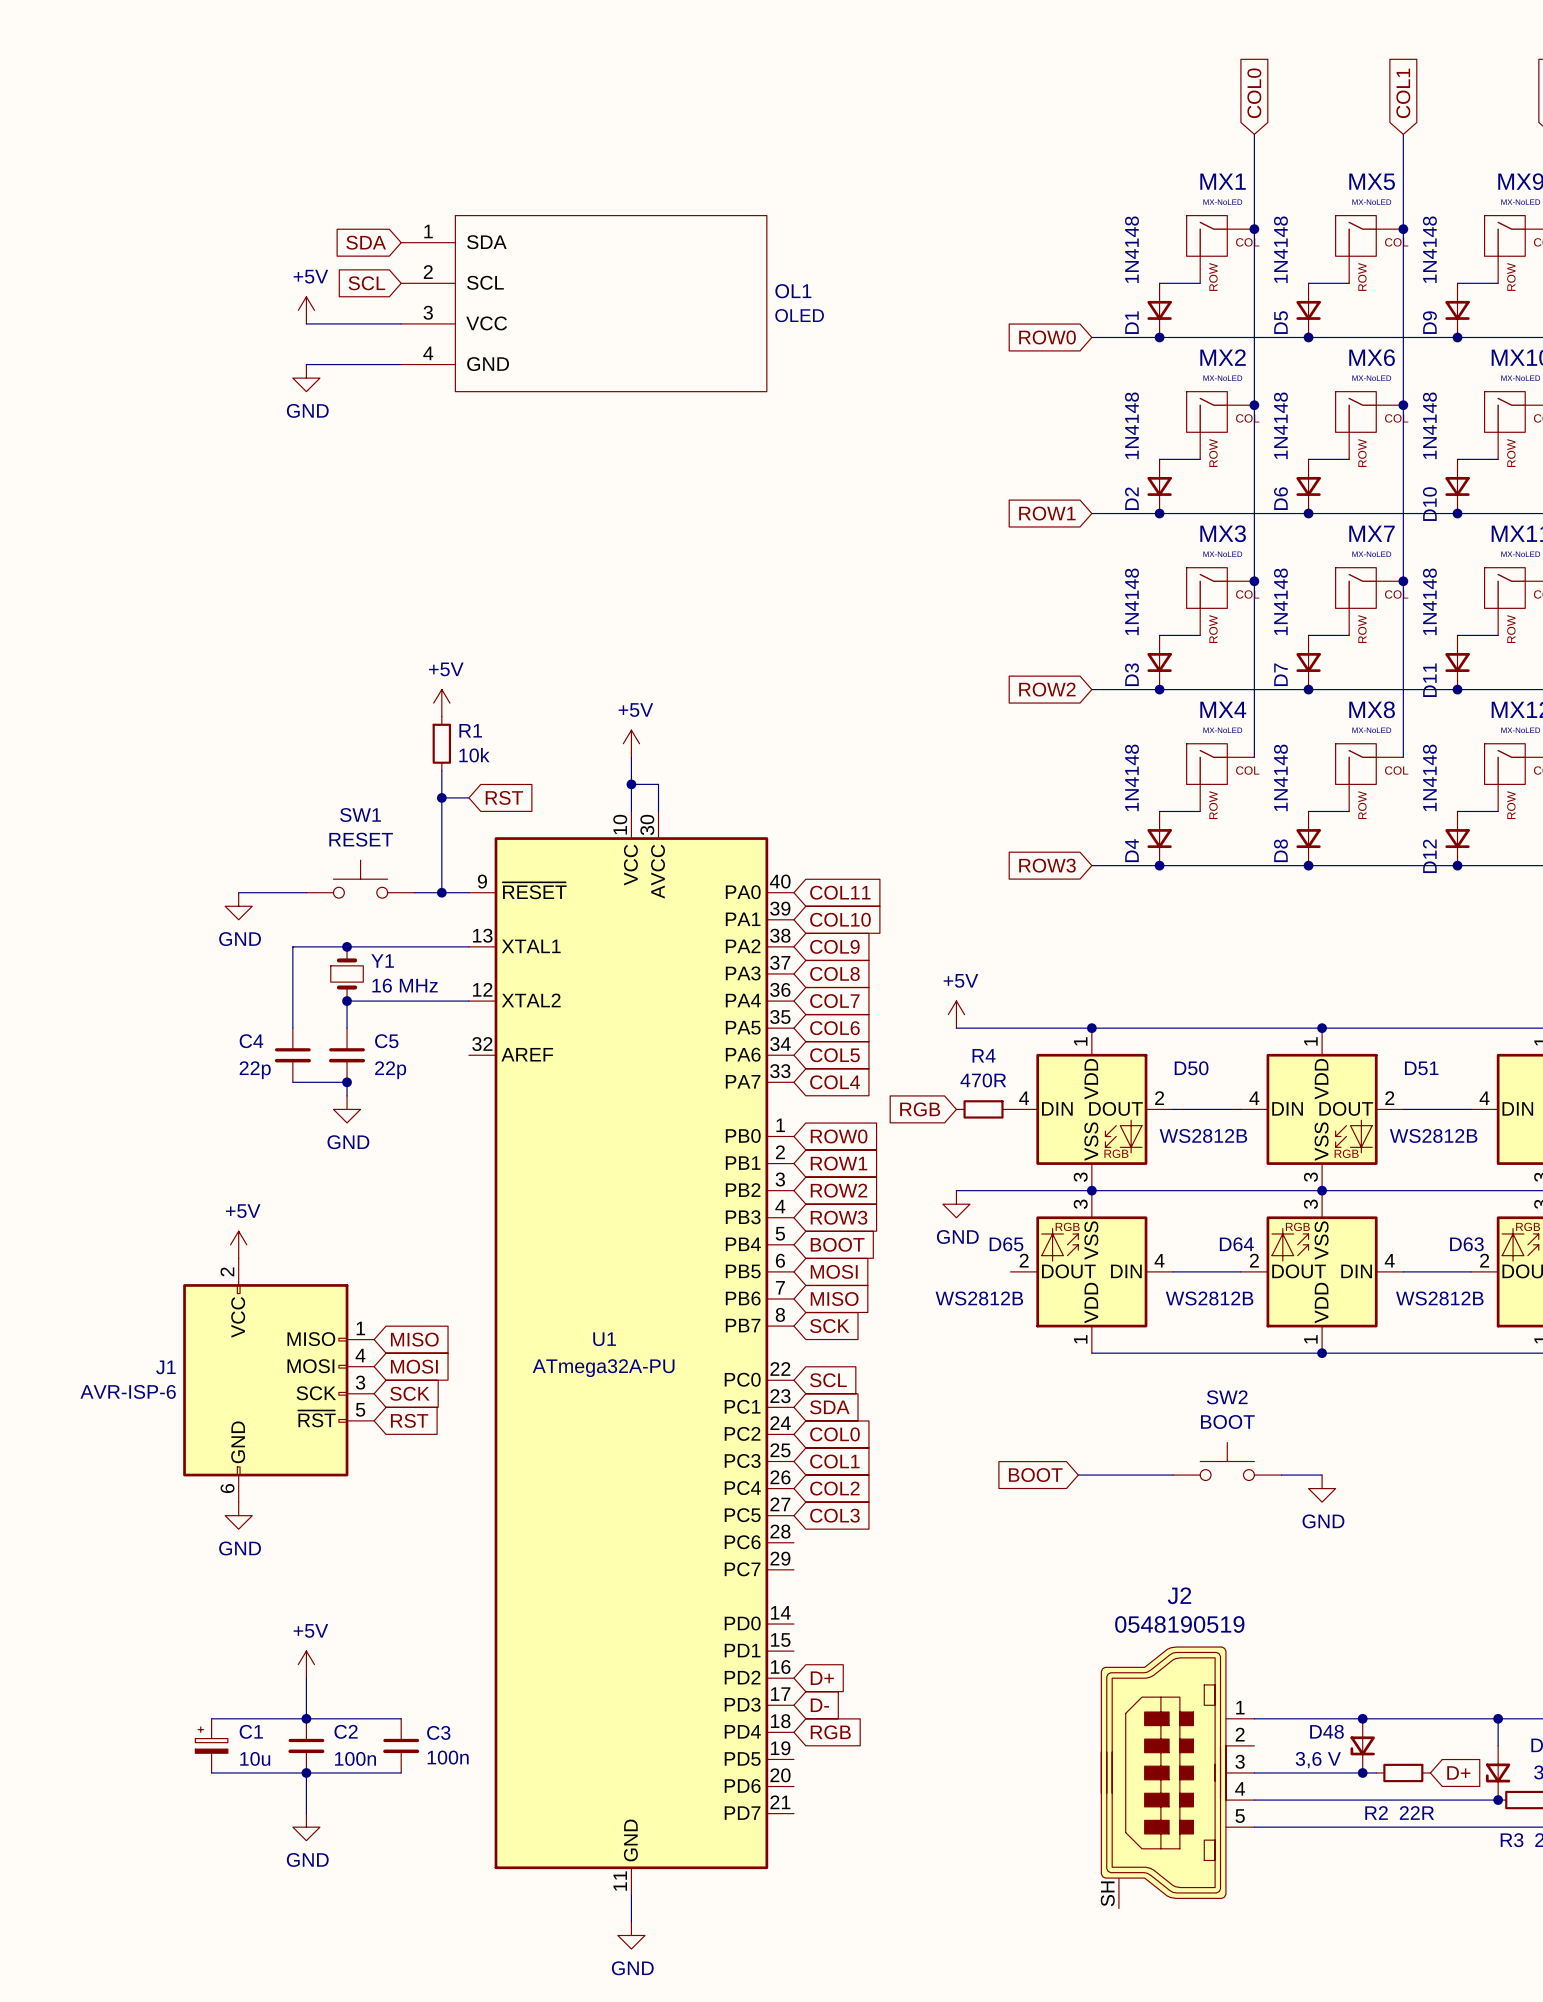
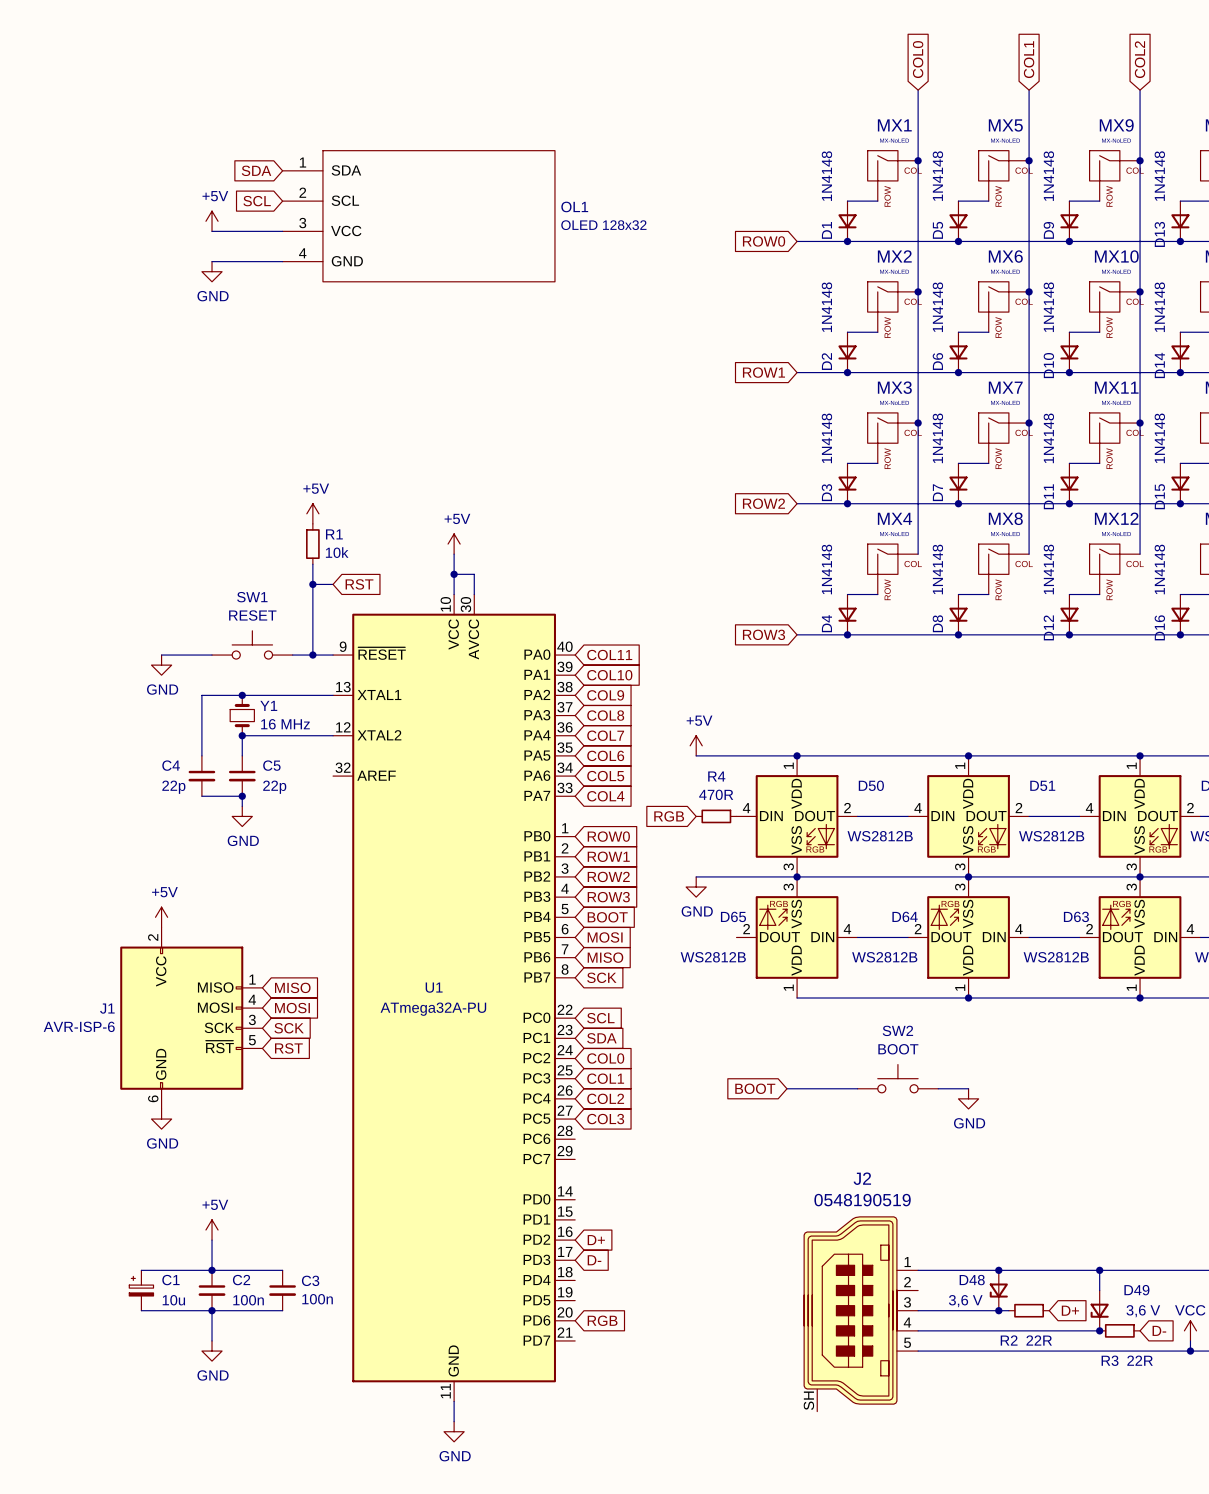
OL1 value: OLED (799, 315) -> OLED 128x32 (603, 225)
global label position: RGB (830, 1732) -> RGB (602, 1320)

